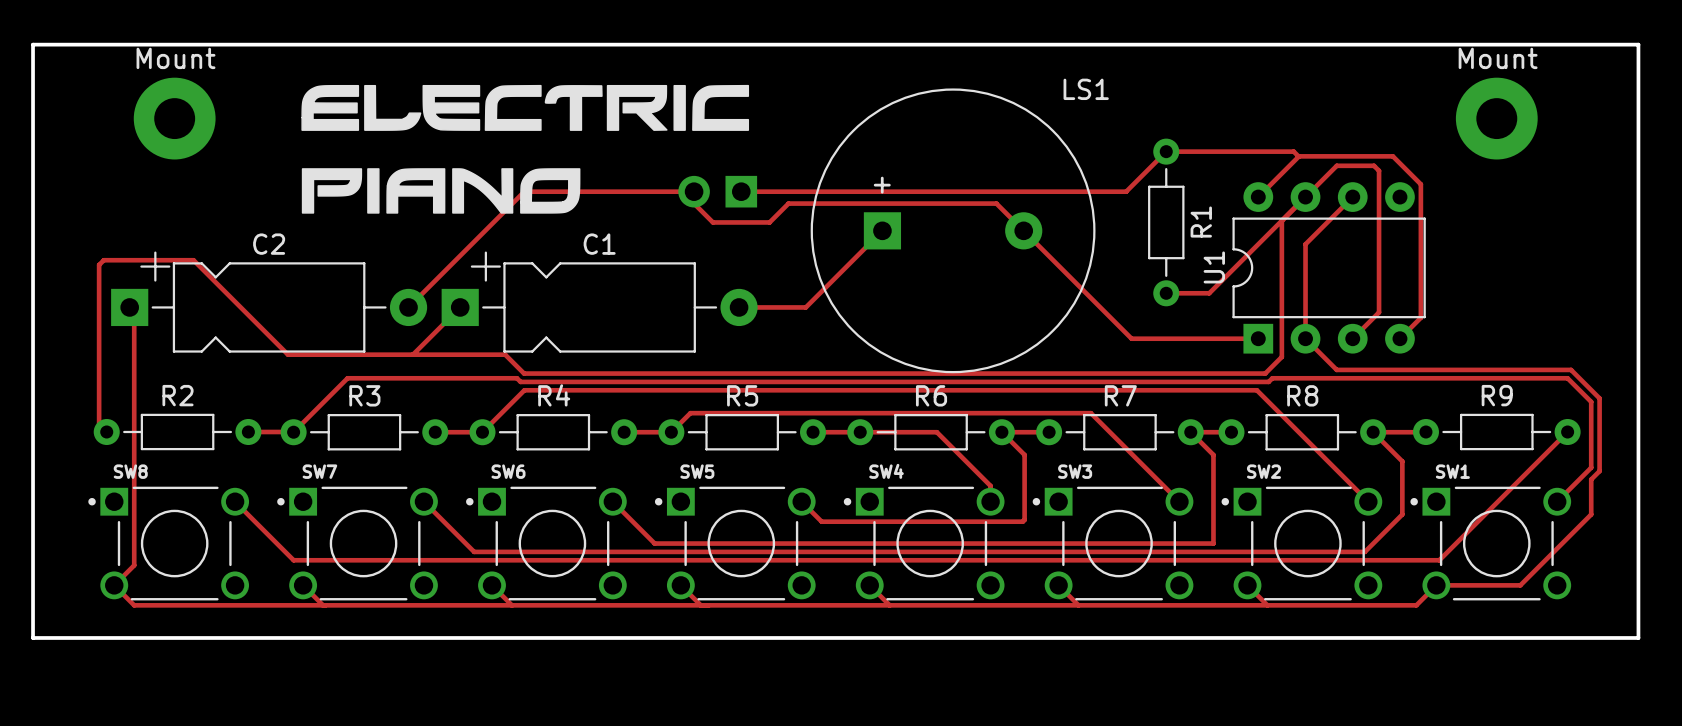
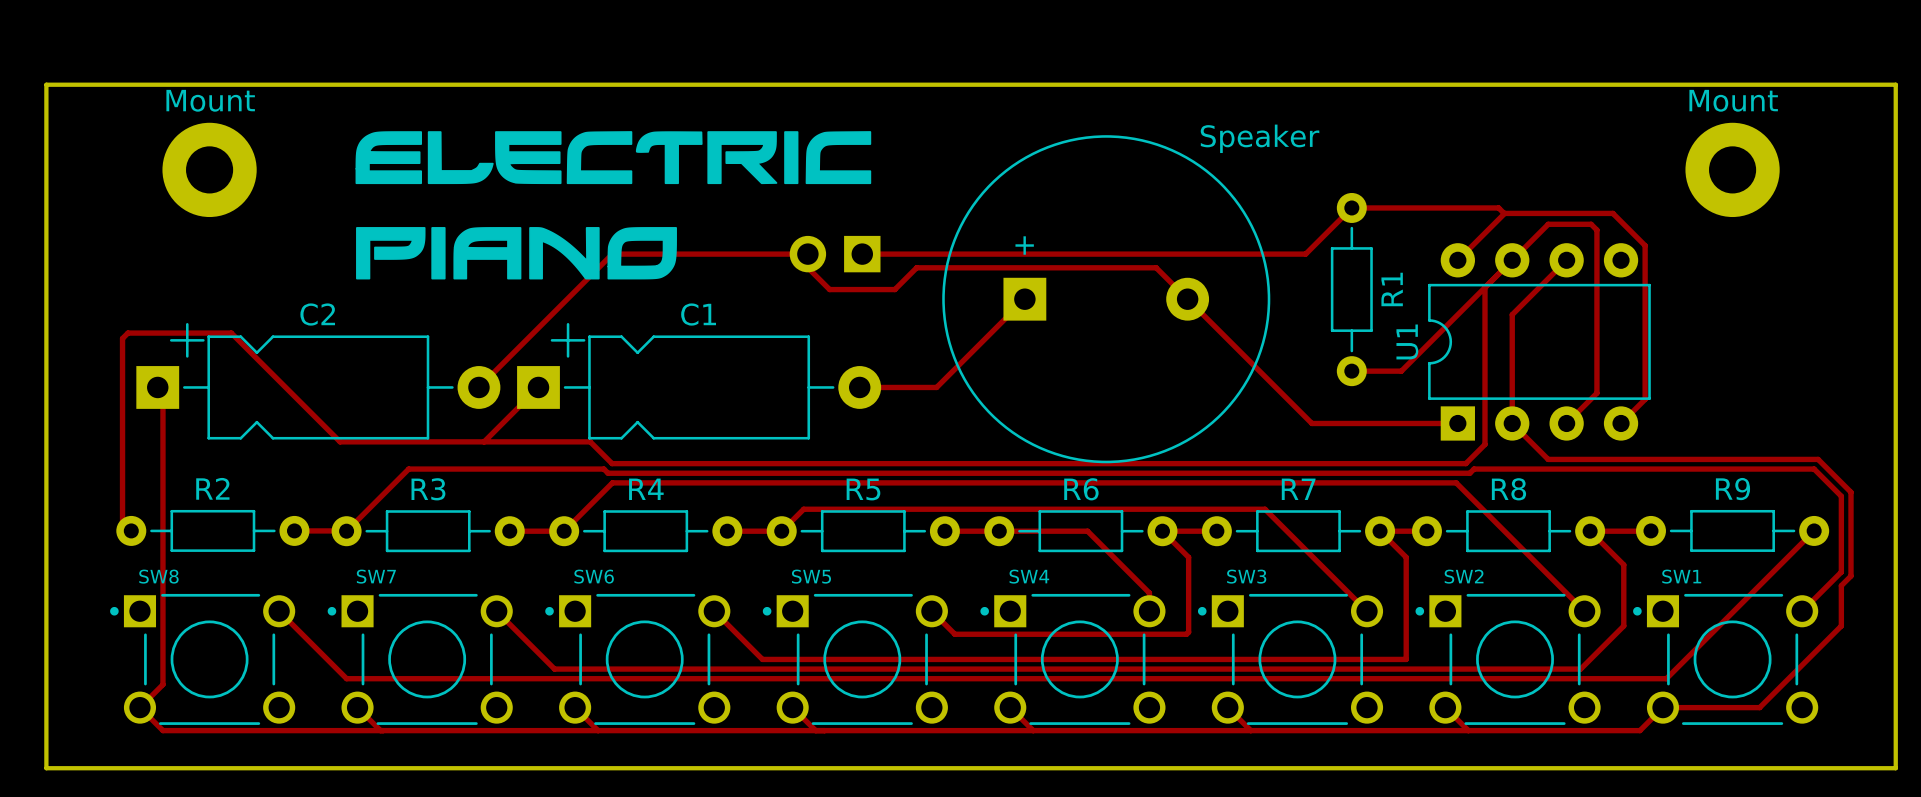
LS1 name: LS1 (1086, 89) -> Speaker (1260, 138)

